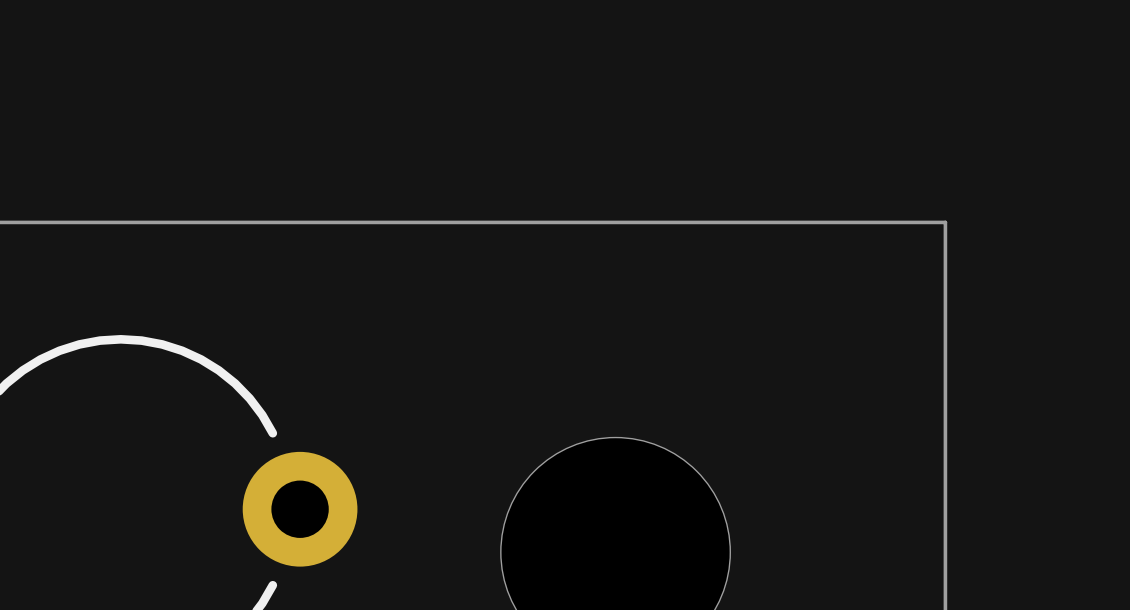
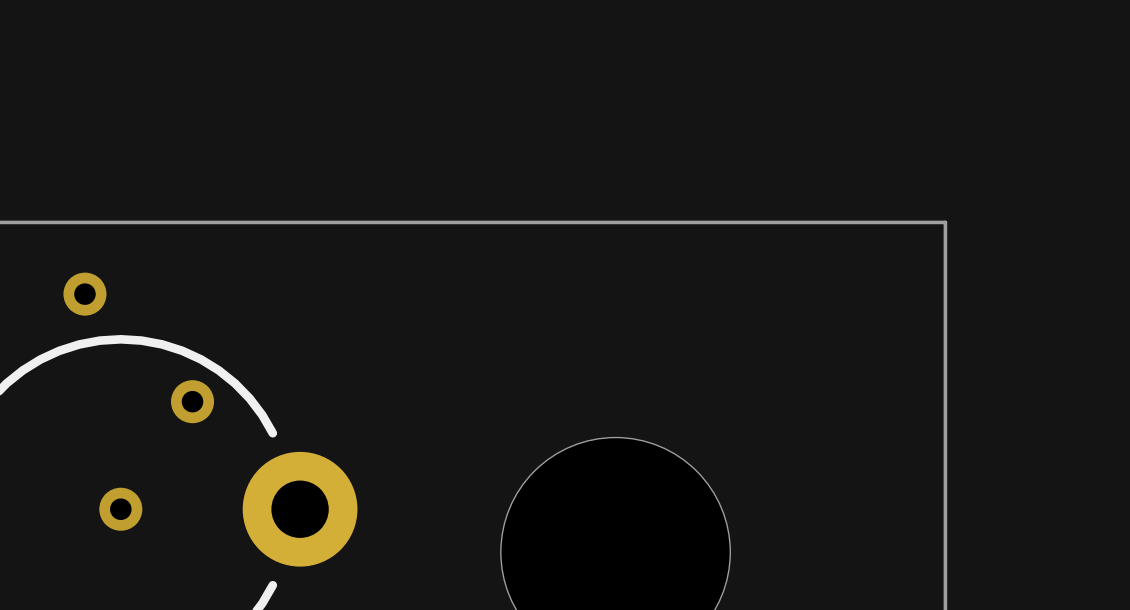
via: none -> (84, 294)
via: none -> (192, 401)
via: none -> (120, 509)

